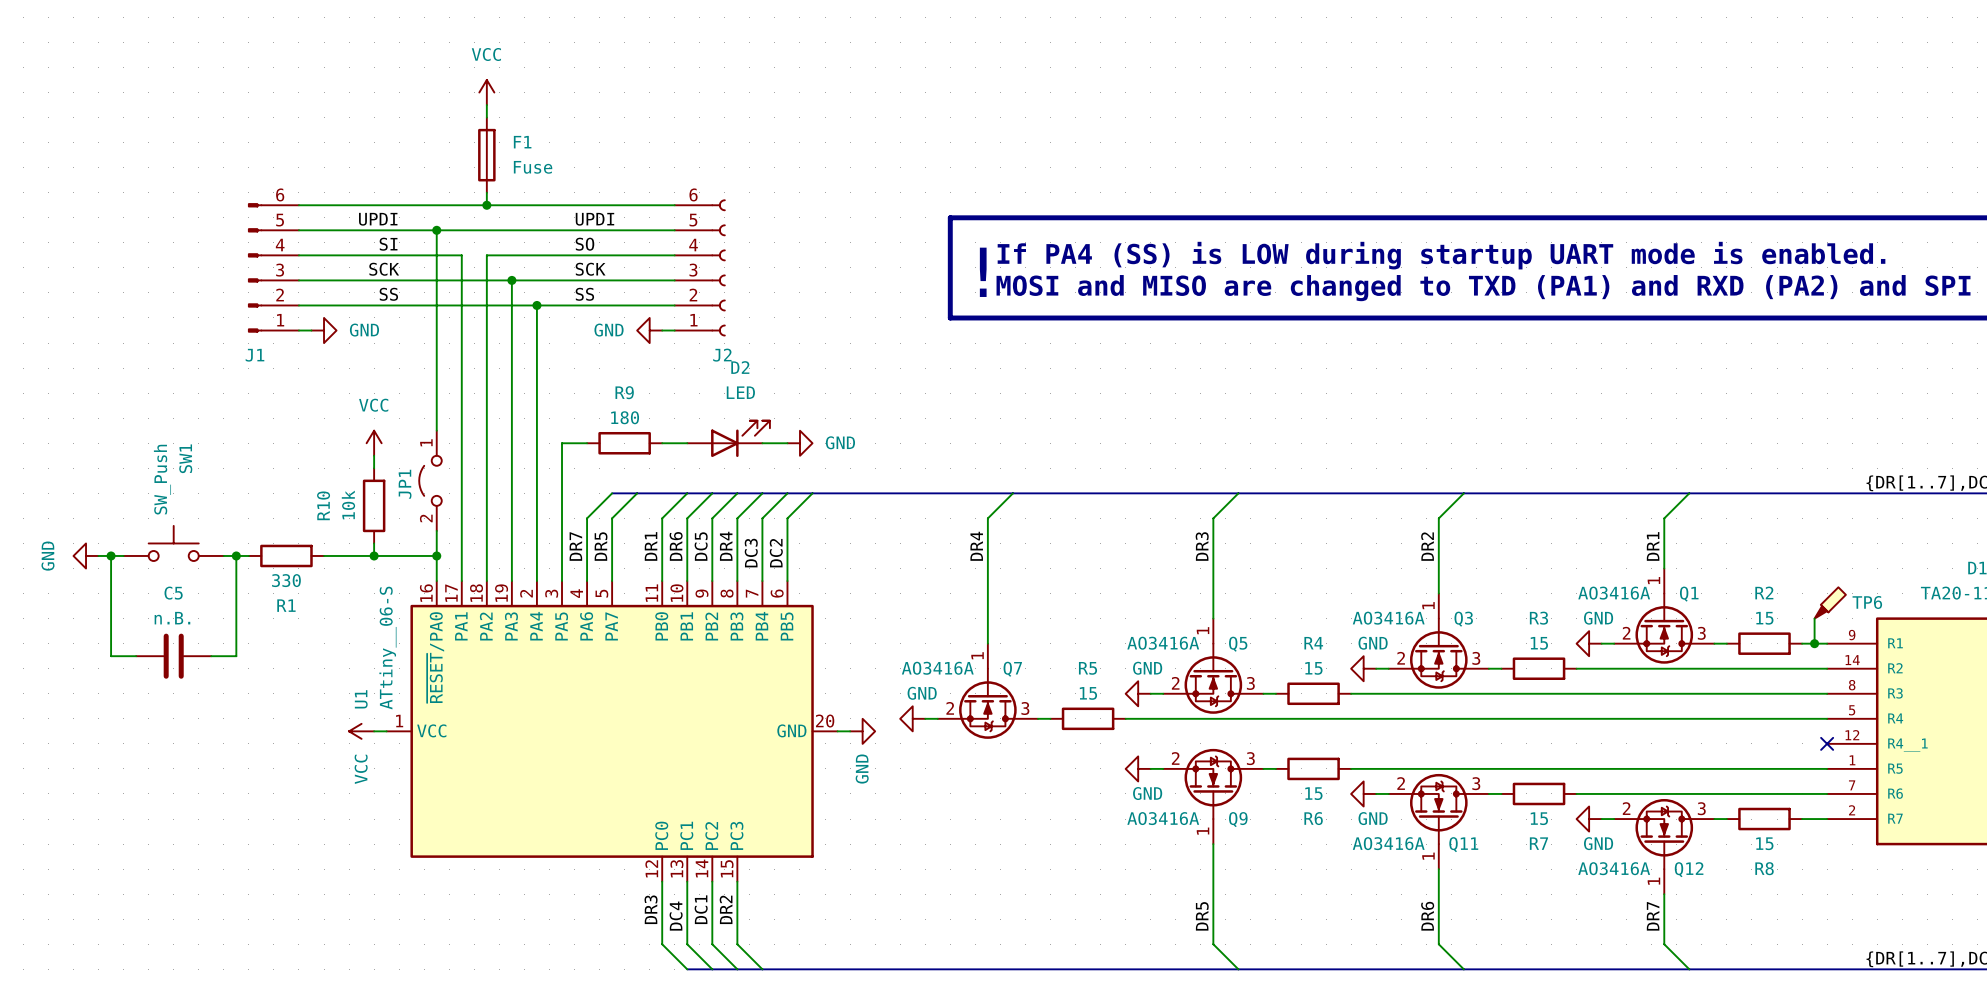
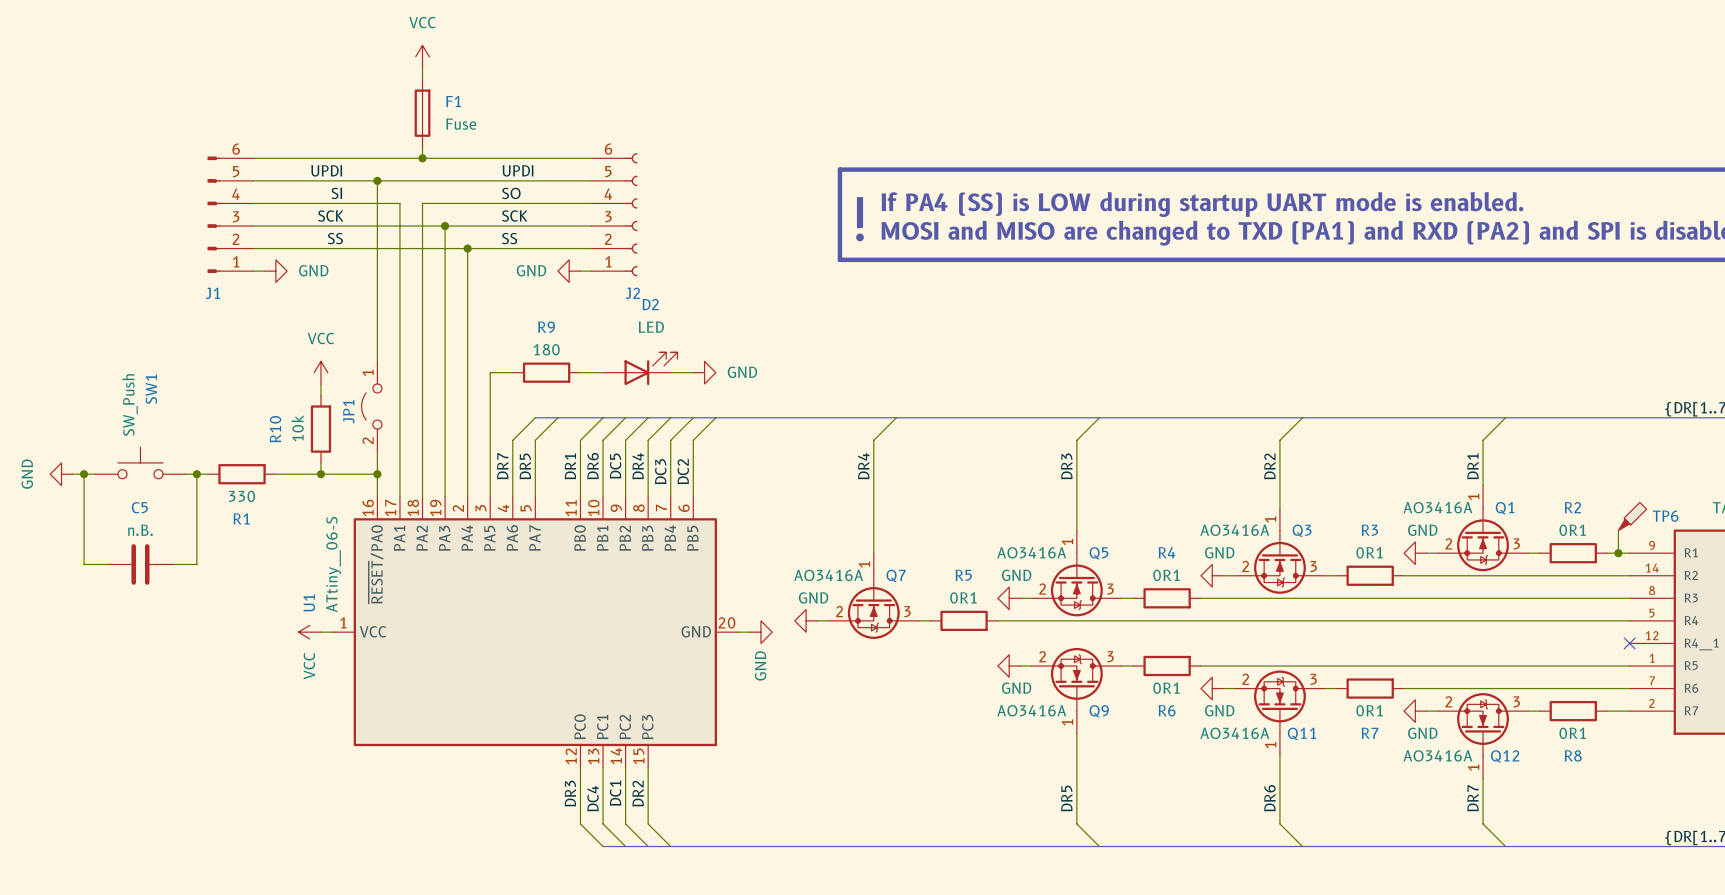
R2 value: 15 (1764, 618) -> 0R1 (1572, 530)
R3 value: 15 (1539, 643) -> 0R1 (1369, 552)
R4 value: 15 (1313, 668) -> 0R1 (1166, 575)
R5 value: 15 (1088, 693) -> 0R1 (963, 597)
R6 value: 15 (1313, 793) -> 0R1 (1166, 688)
R7 value: 15 (1539, 818) -> 0R1 (1369, 710)
R8 value: 15 (1764, 843) -> 0R1 (1572, 733)

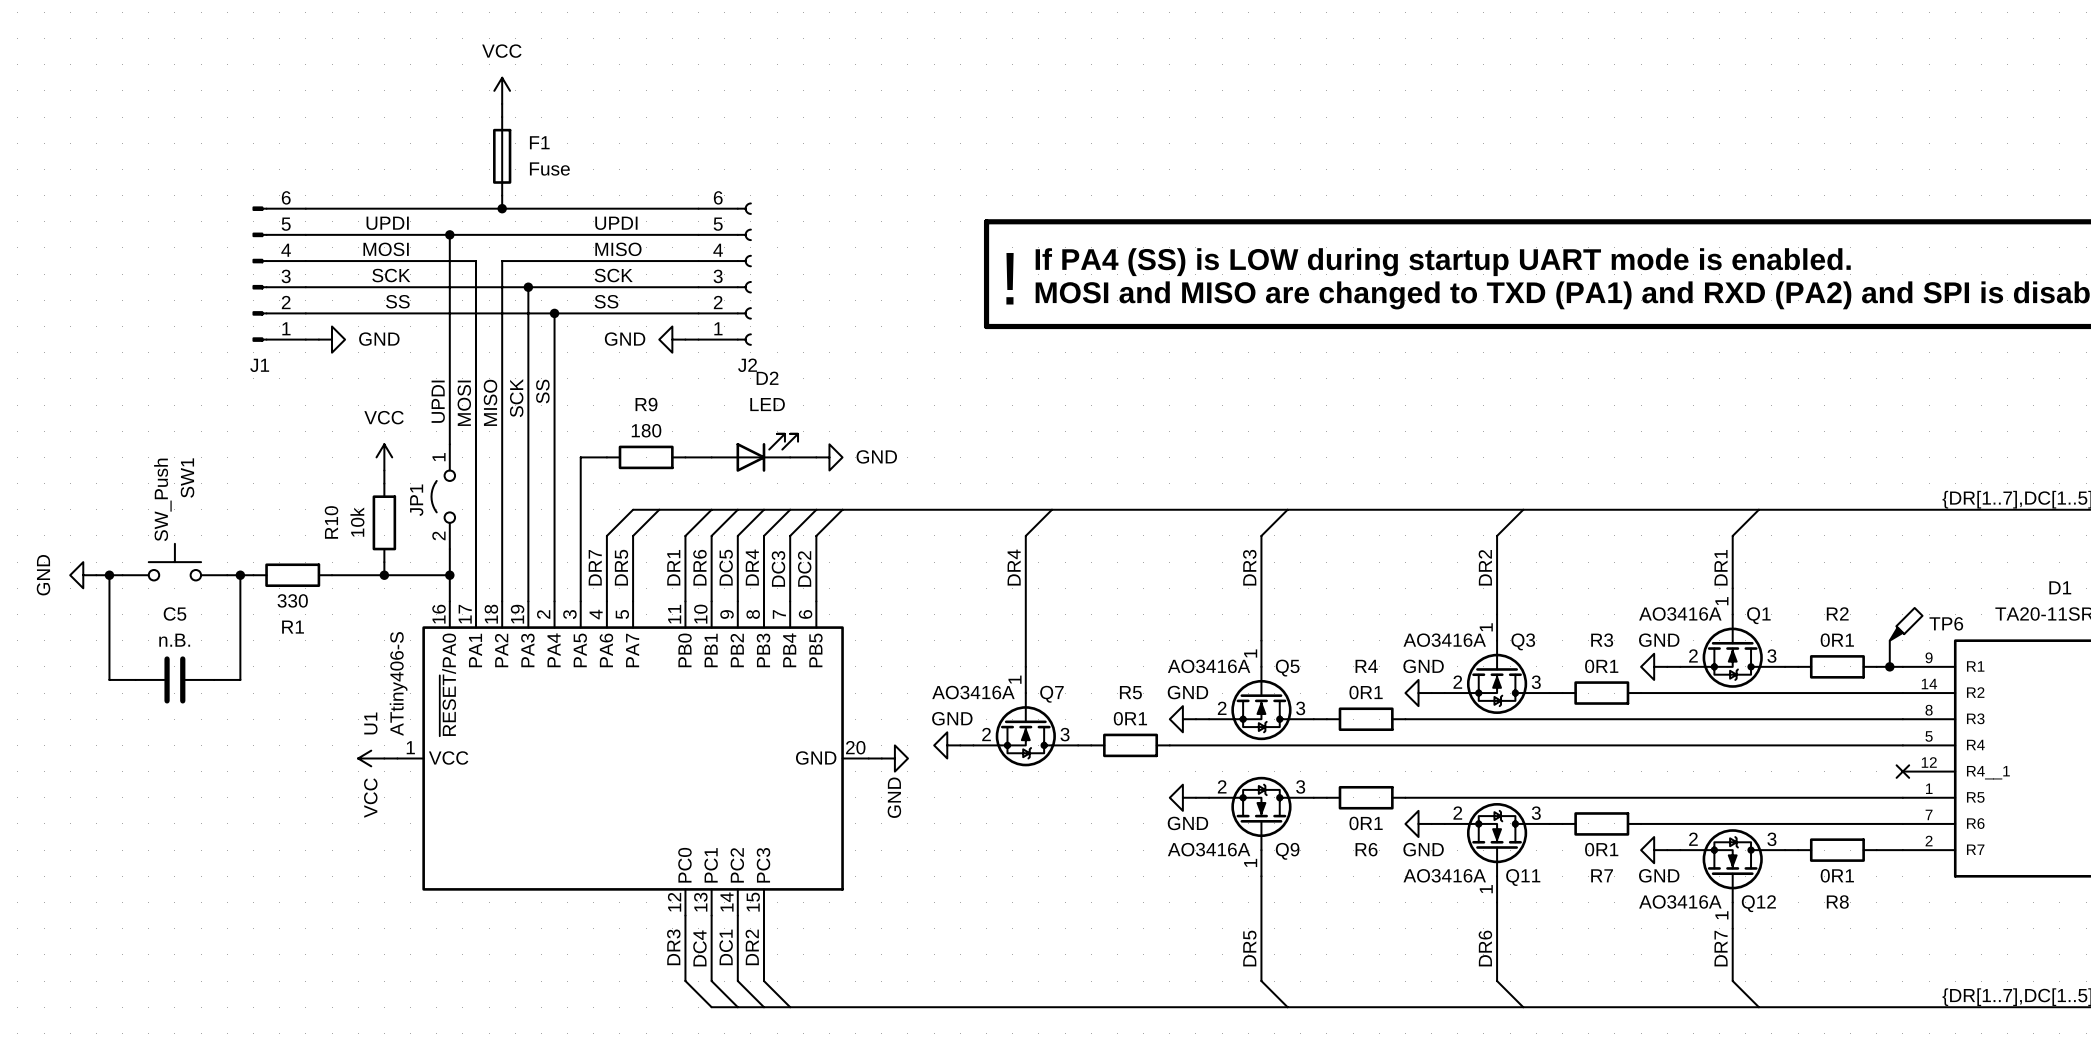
label: SI (336, 193) -> MOSI (386, 249)
label: SO (511, 193) -> MISO (618, 249)
label: none -> SS (542, 391)
label: none -> SCK (516, 398)
label: none -> UPDI (438, 401)
label: none -> MISO (490, 402)
label: none -> MOSI (464, 403)
U1 value: ATtiny__06-S (333, 564) -> ATtiny406-S (398, 683)

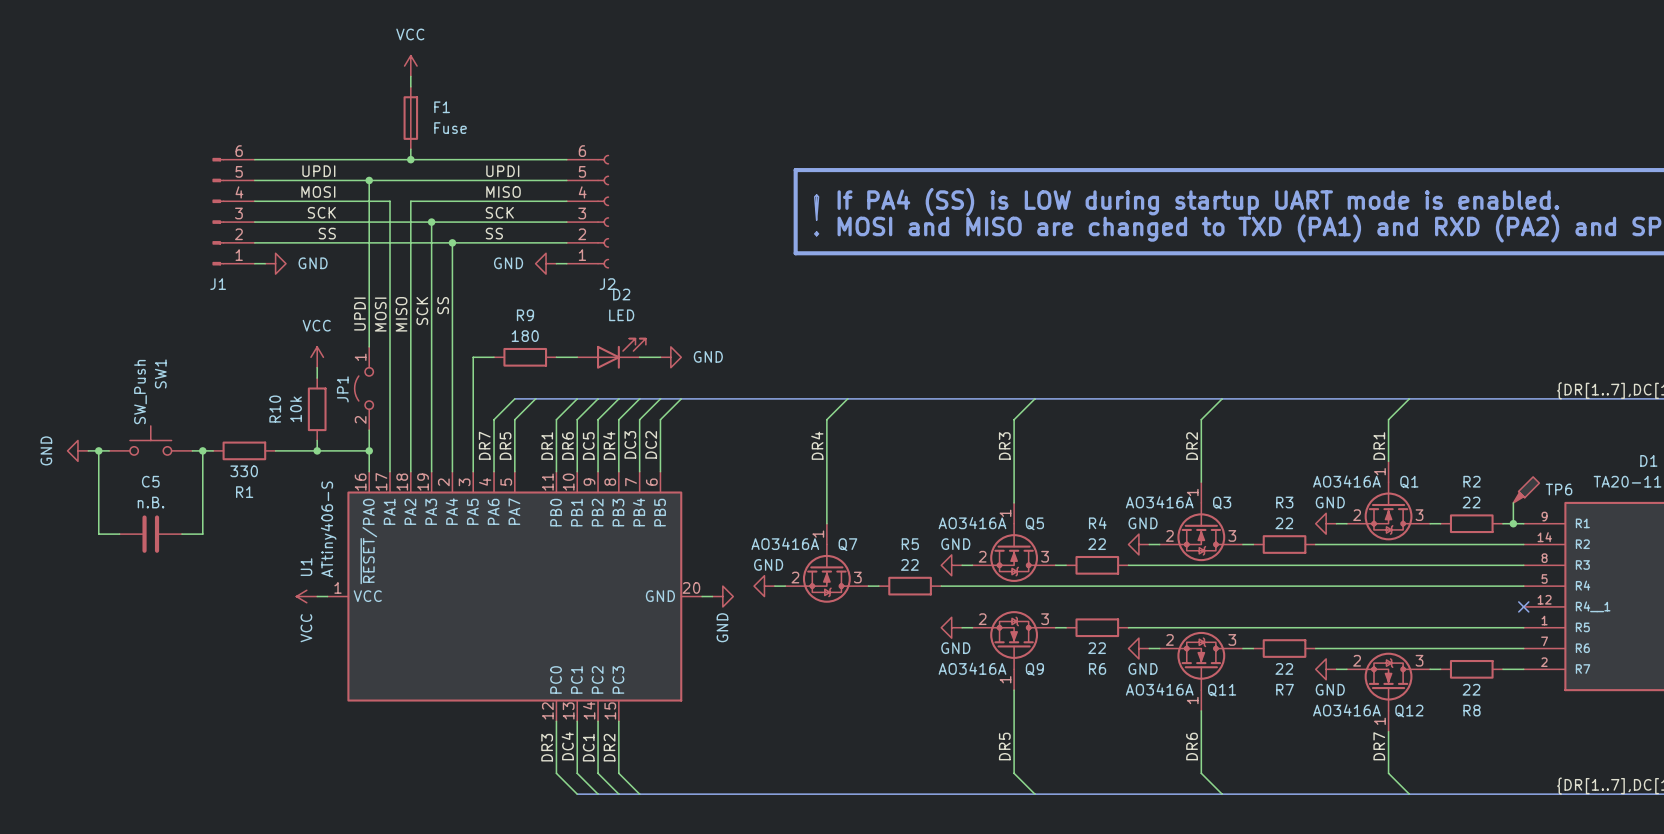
R2 value: 0R1 (1837, 640) -> 22 (1471, 502)
R3 value: 0R1 (1601, 666) -> 22 (1284, 523)
R4 value: 0R1 (1366, 692) -> 22 (1097, 544)
R5 value: 0R1 (1130, 718) -> 22 (909, 564)
R6 value: 0R1 (1366, 823) -> 22 (1097, 648)
R7 value: 0R1 (1601, 849) -> 22 (1284, 668)
R8 value: 0R1 (1837, 875) -> 22 (1471, 689)

